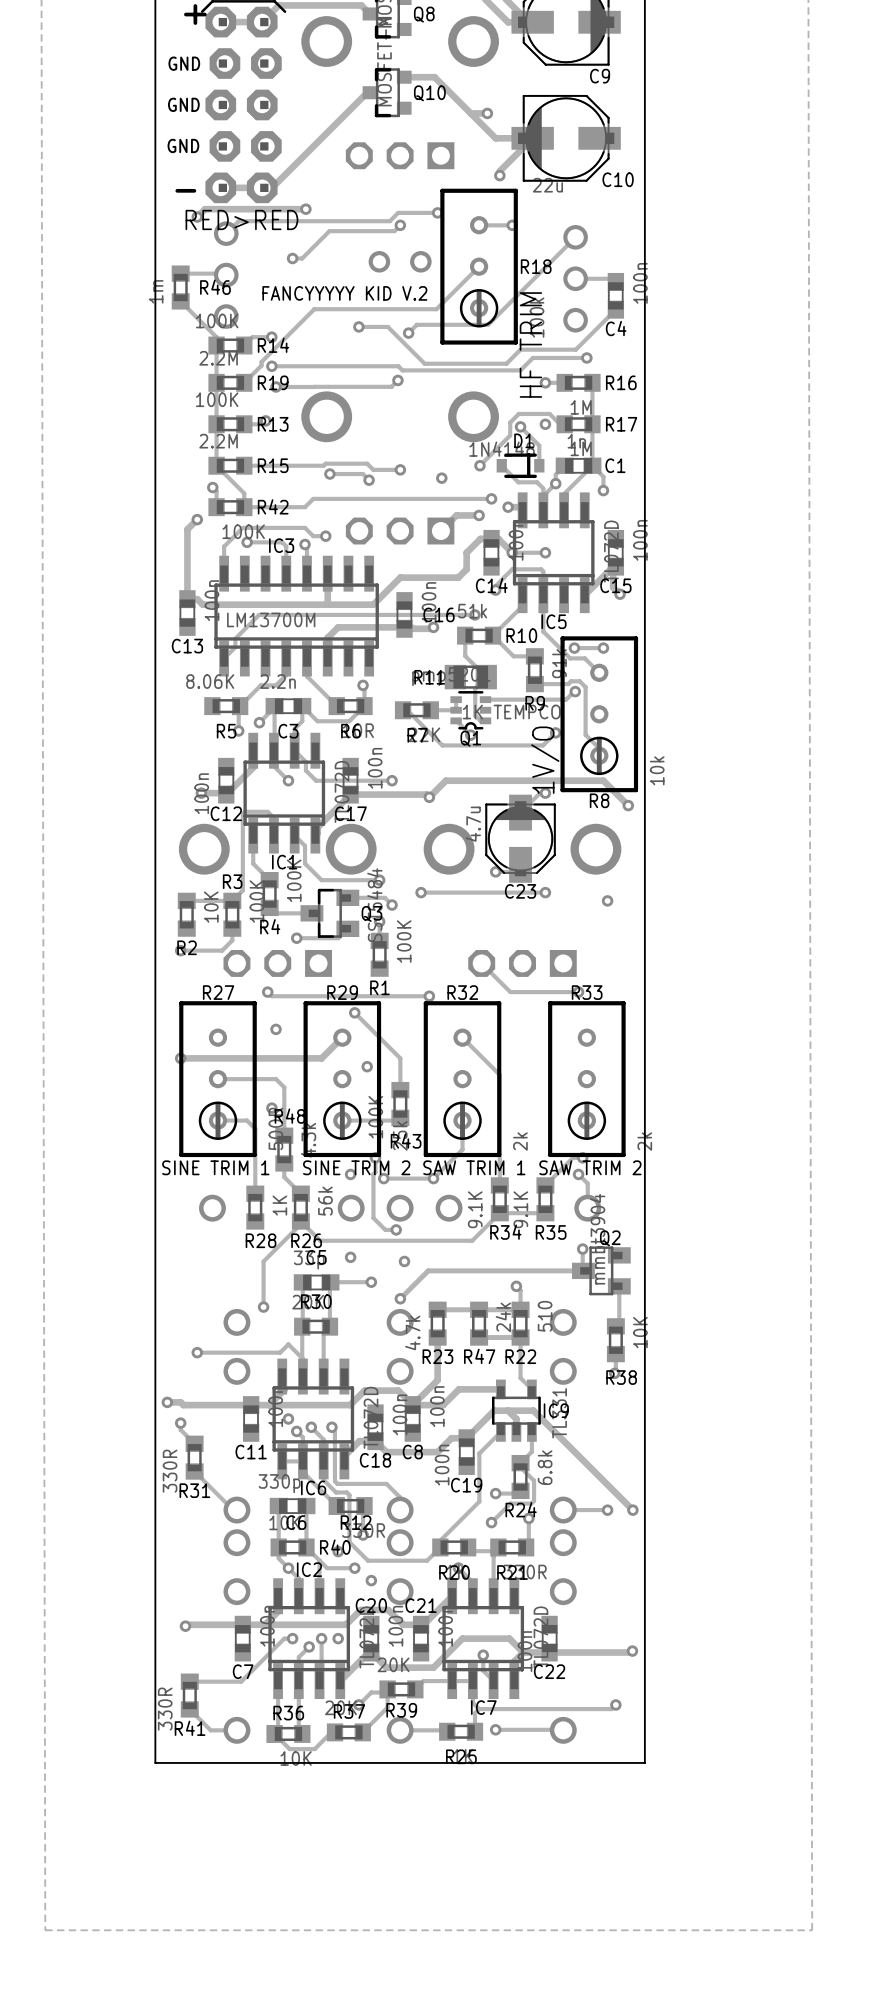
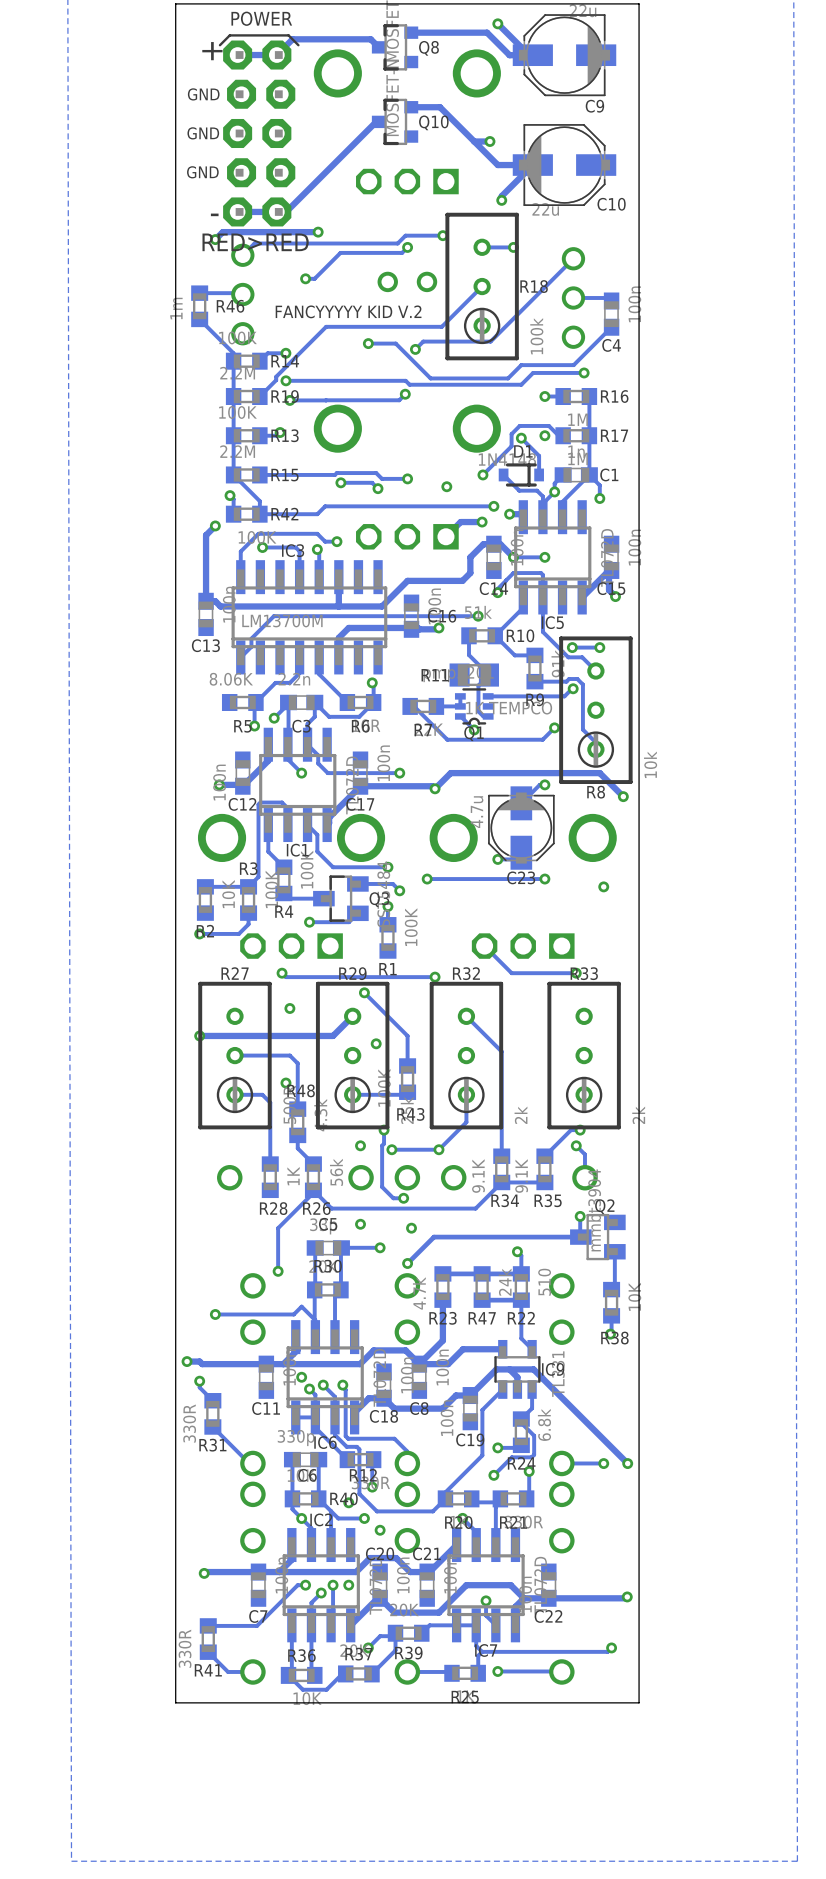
text: HF TRIM (530, 345) -> none
text: 1V/O (545, 760) -> none
text: SINE TRIM 1 (215, 1167) -> none
text: SINE TRIM 2 (356, 1167) -> none
text: SAW TRIM 1 (474, 1167) -> none
text: SAW TRIM 2 (590, 1167) -> none

